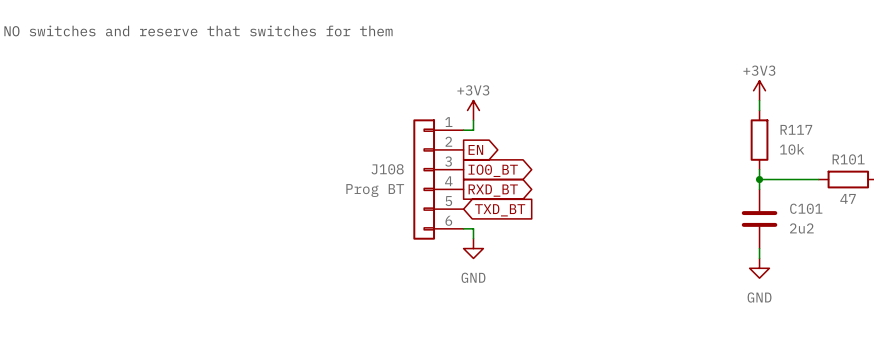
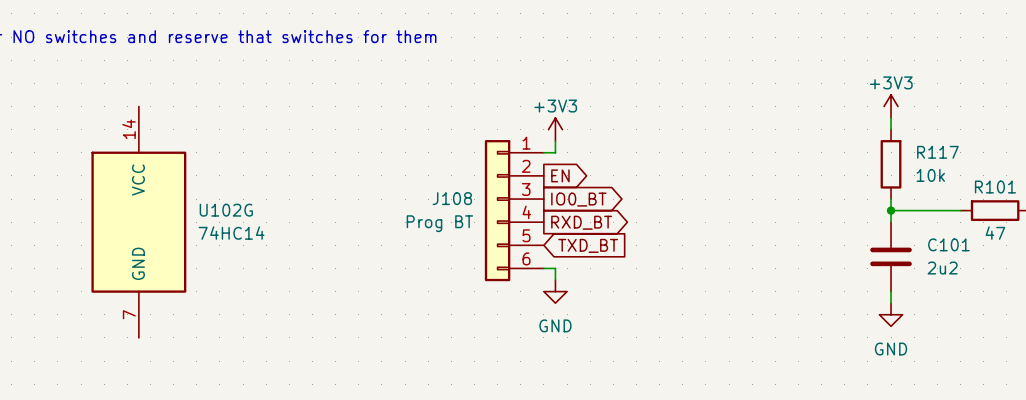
U102G: none -> 74HC14 (138, 222)

